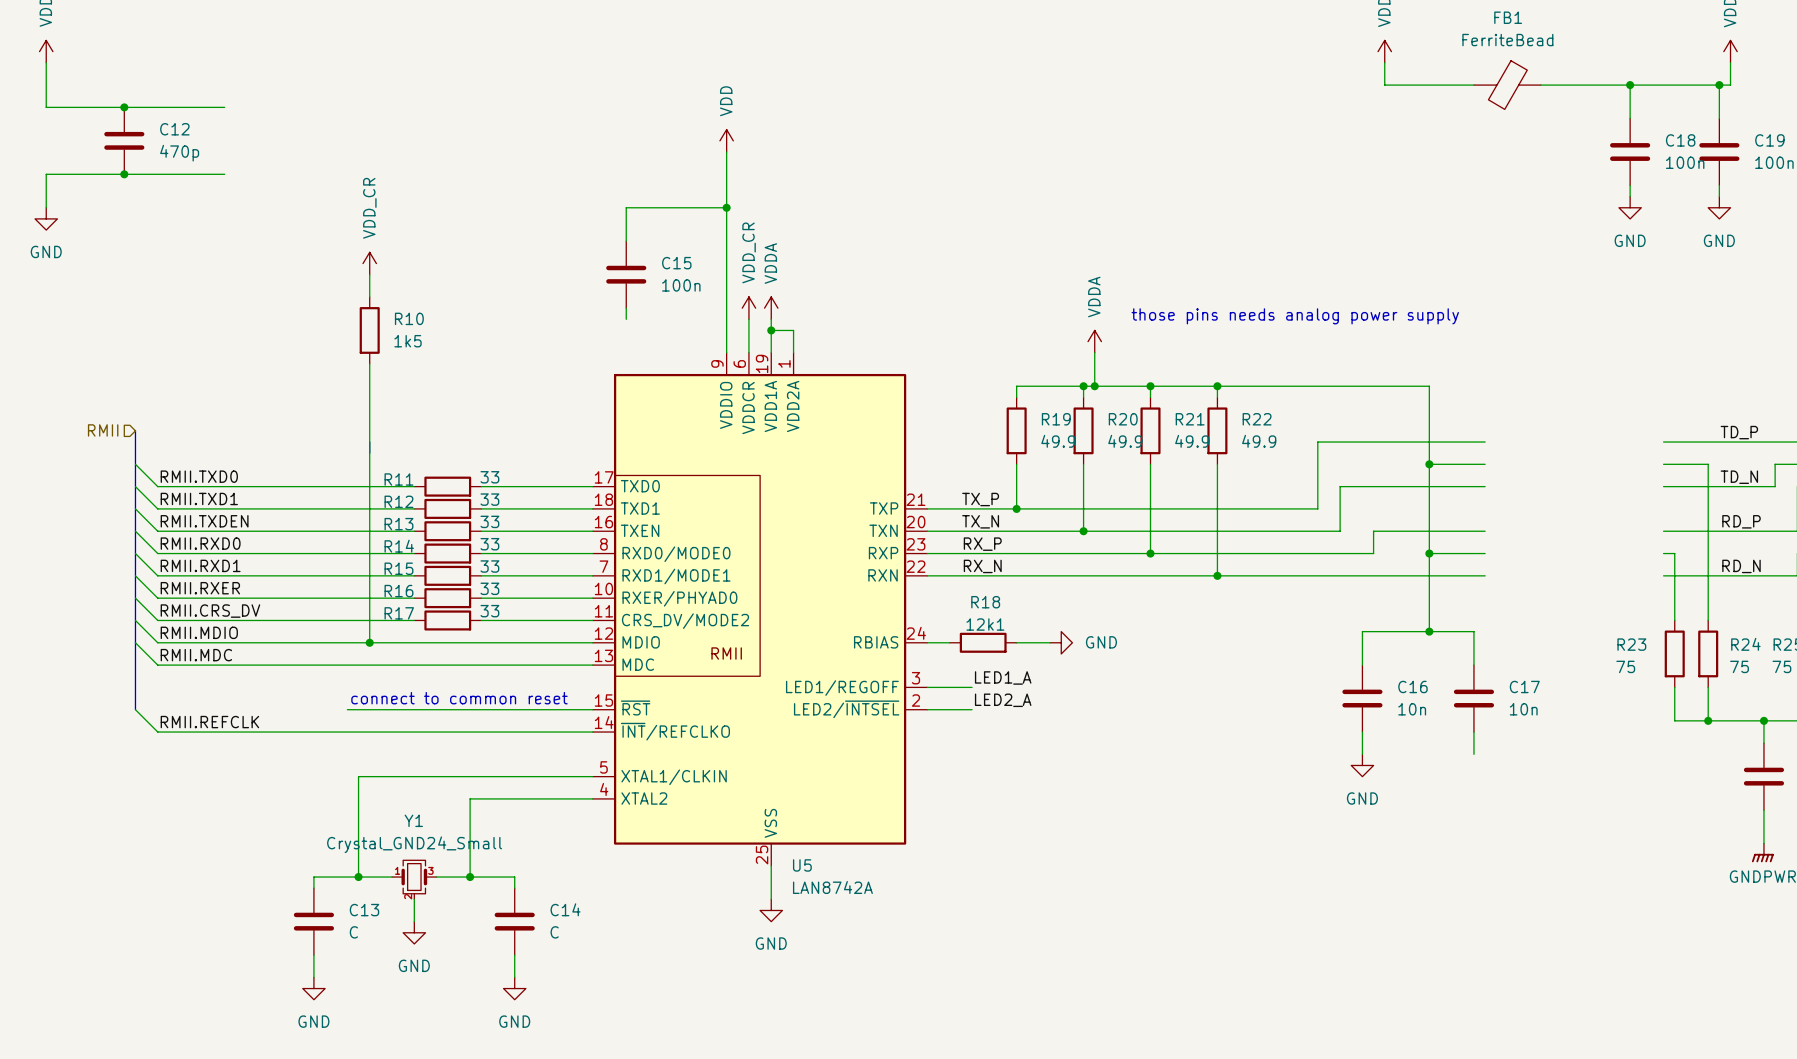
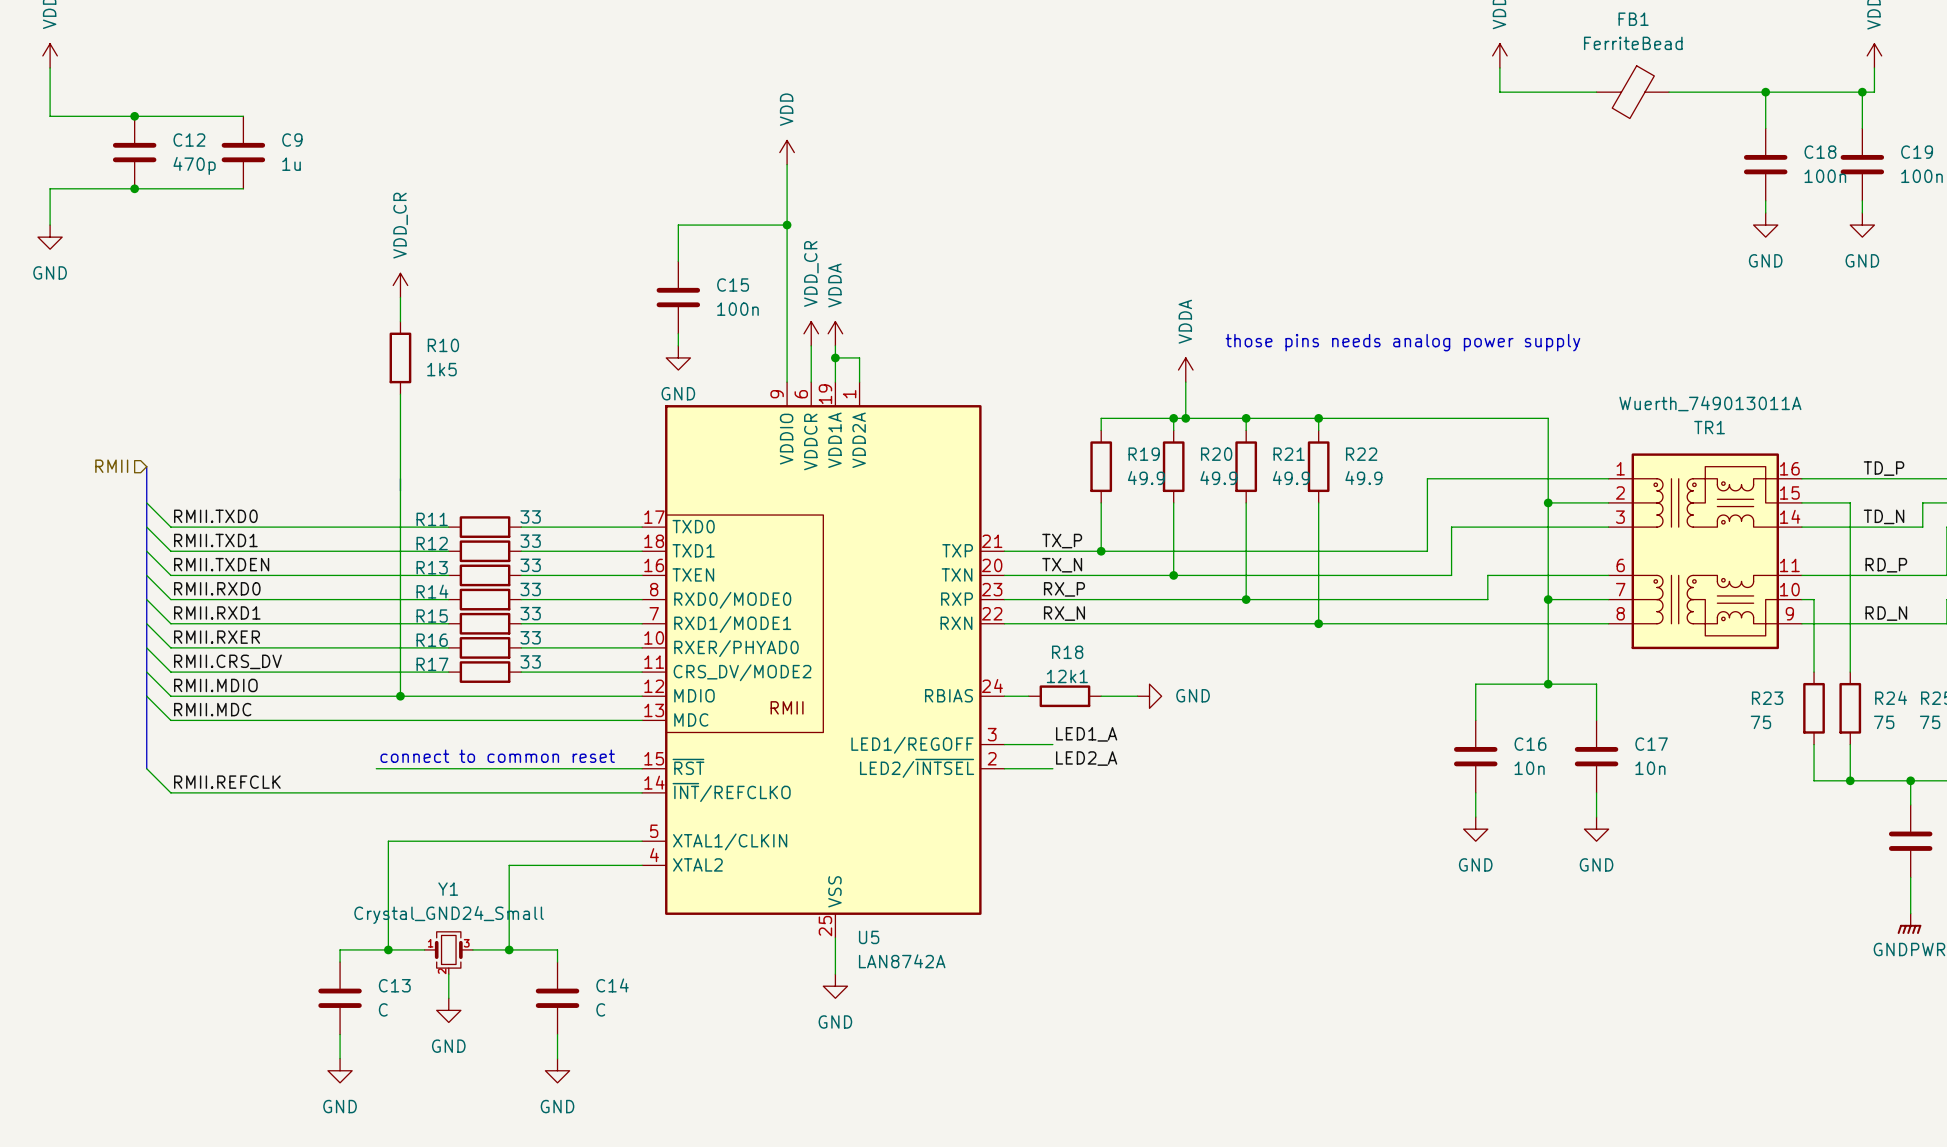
C9: none -> 1u (243, 152)
power symbol: none -> GND (678, 357)
TR1: none -> Wuerth_749013011A (1705, 551)
power symbol: none -> GND (1596, 829)

